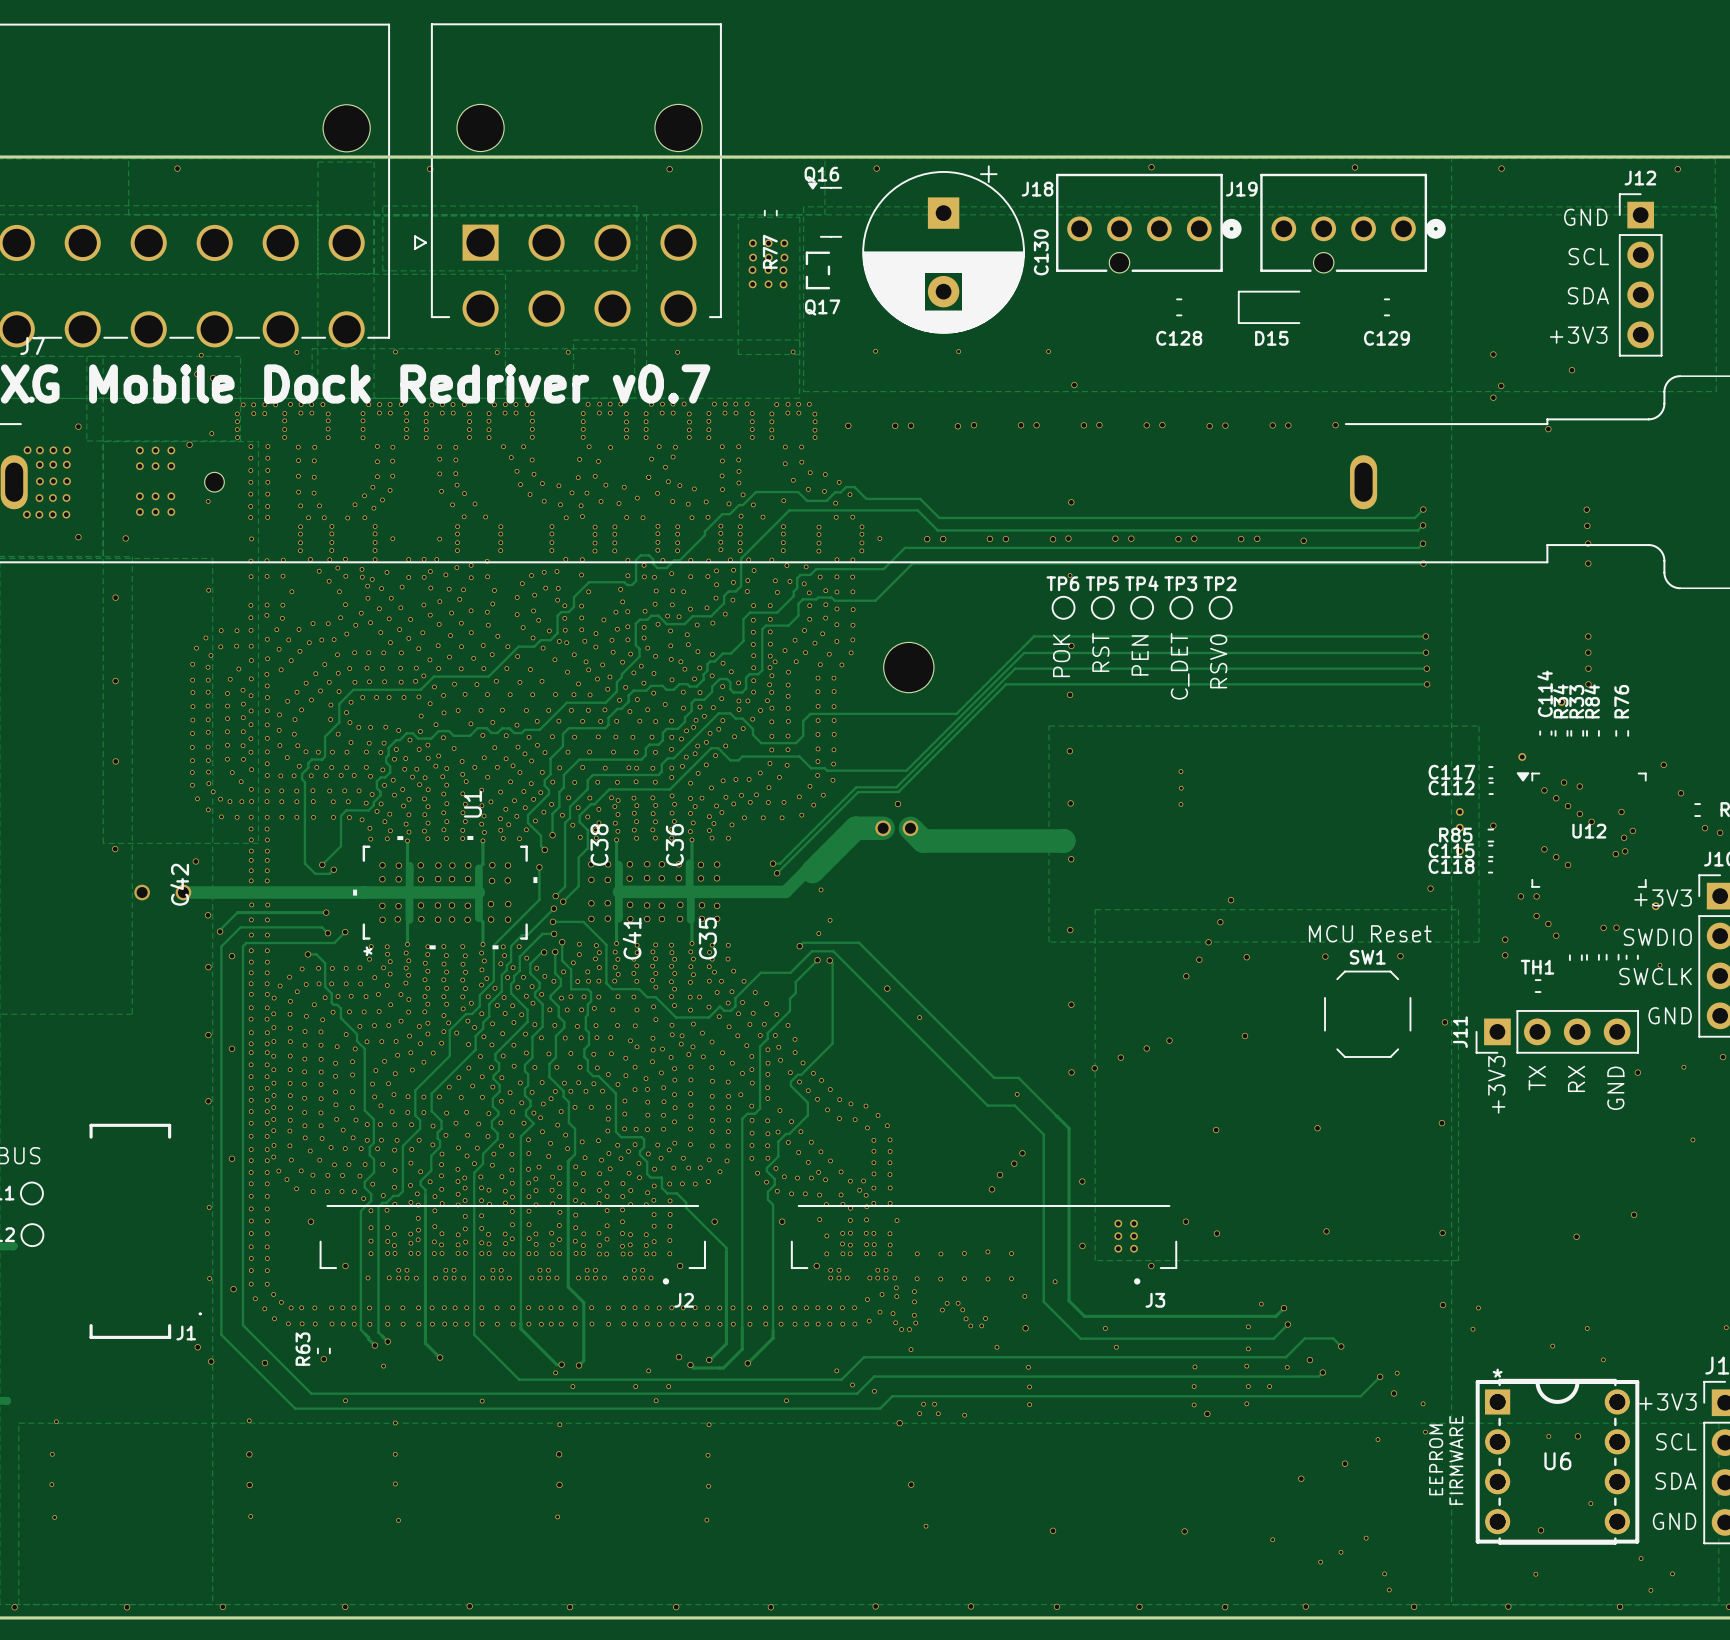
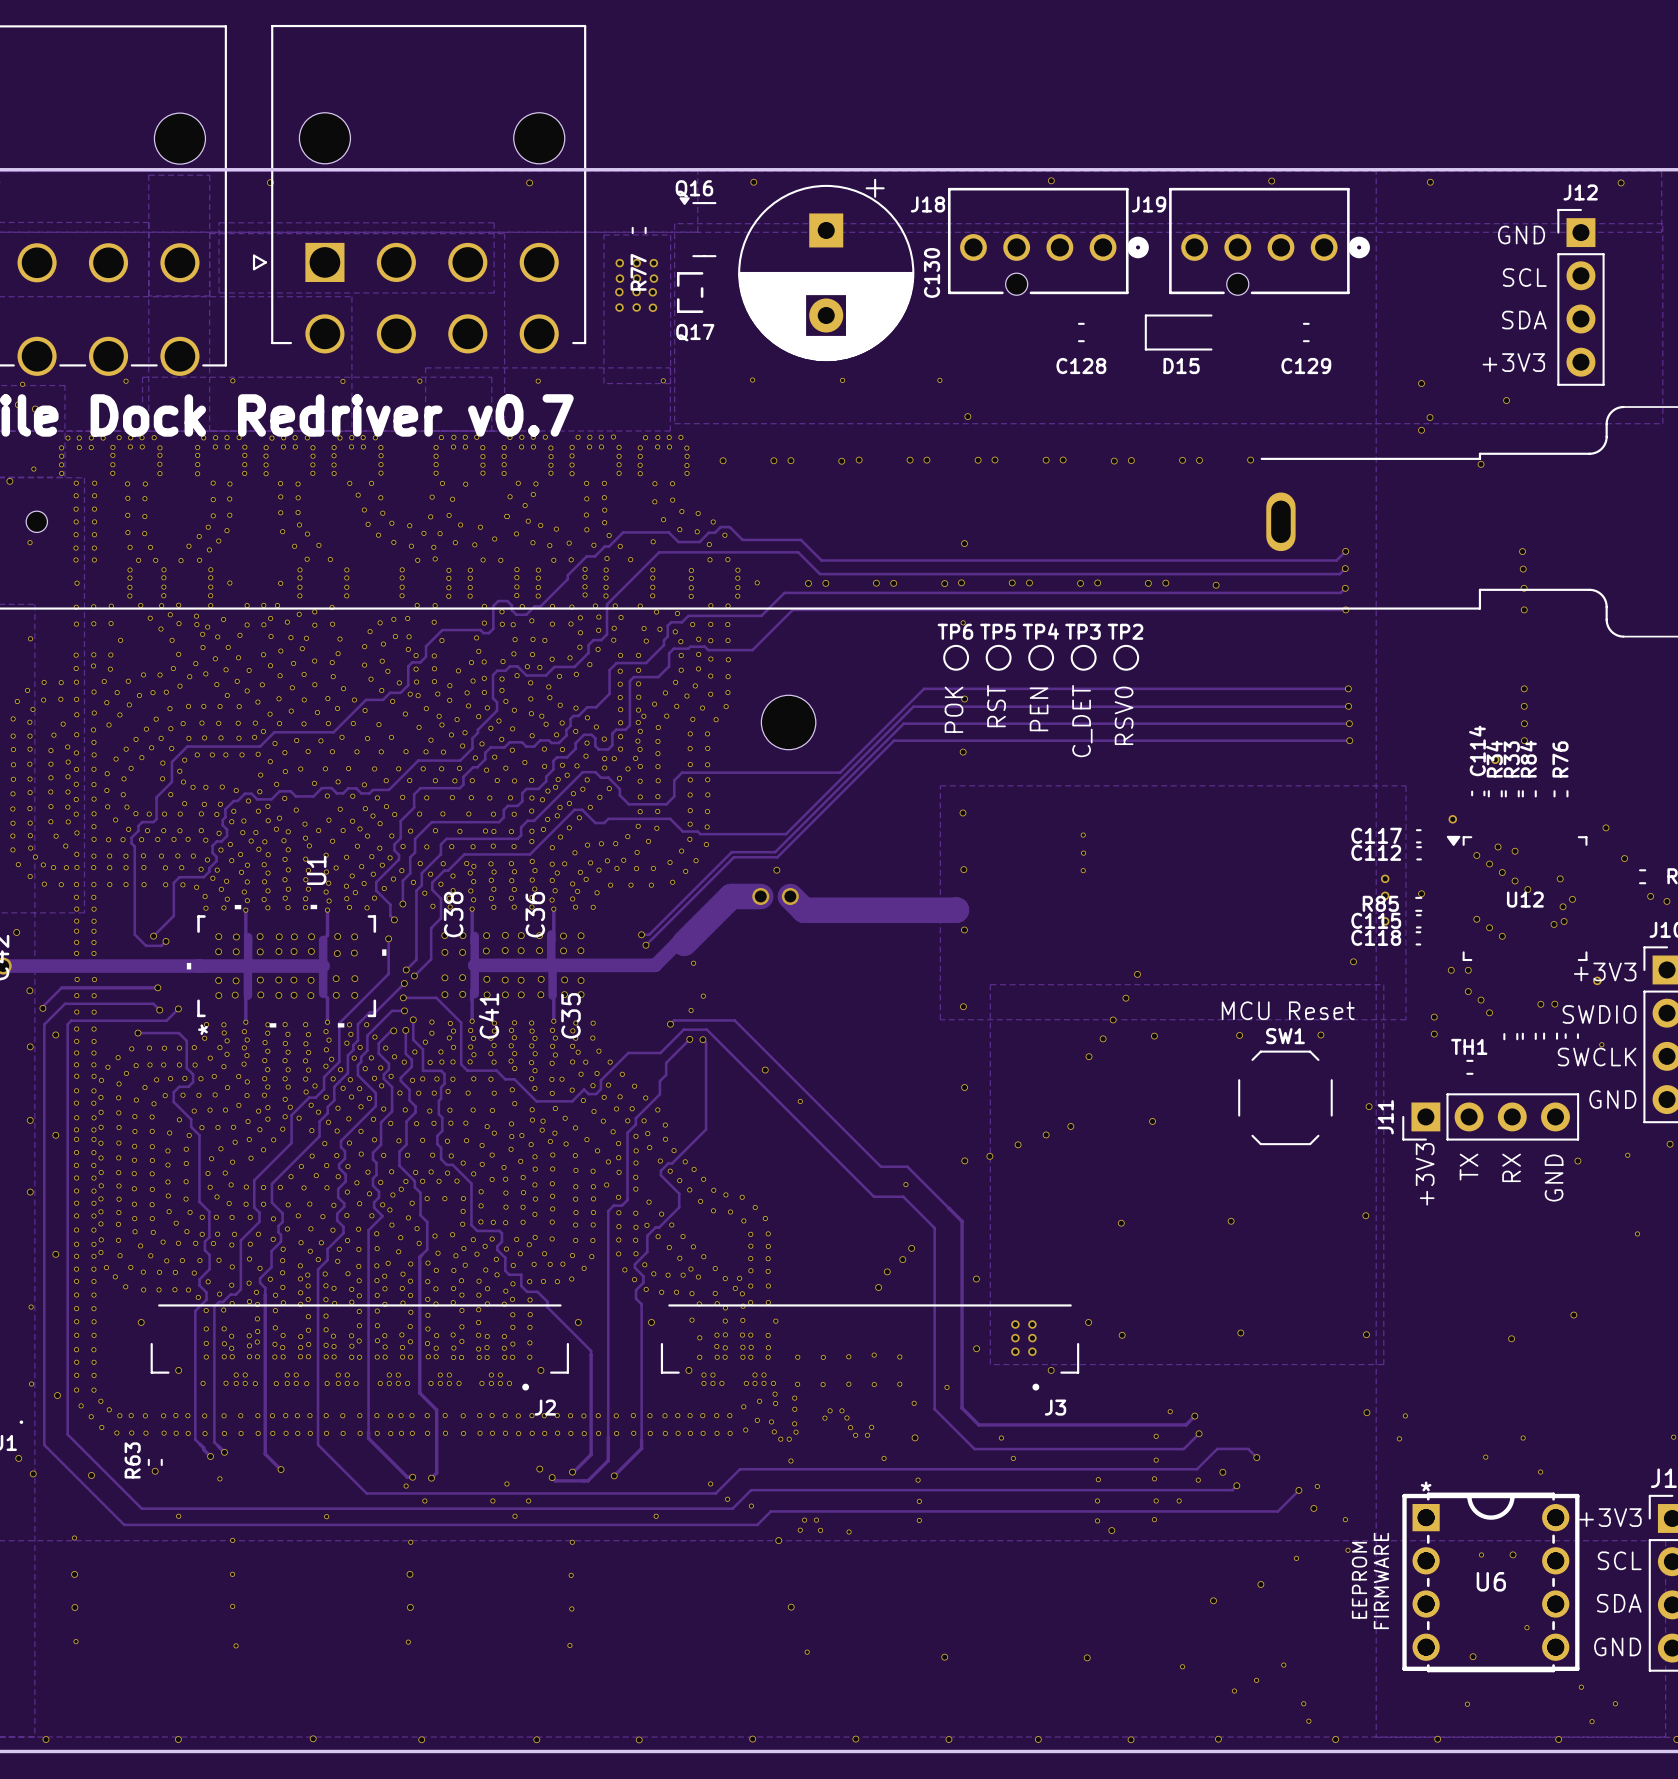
track: (316, 954) (325, 963) (325, 987) (331, 993) (331, 1002) (340, 1009) -> (147, 1033) (178, 1033) (186, 1040) (186, 1068) (193, 1074) (193, 1082) (188, 1086) (179, 1086) (173, 1092)

